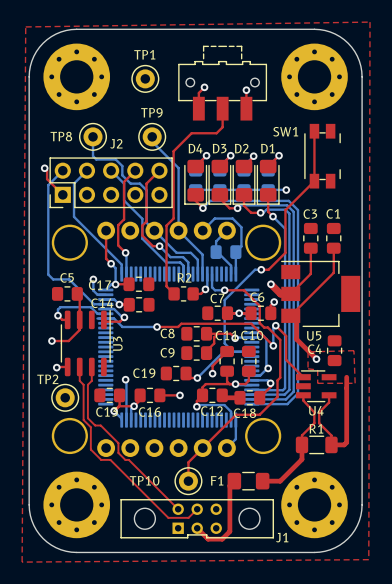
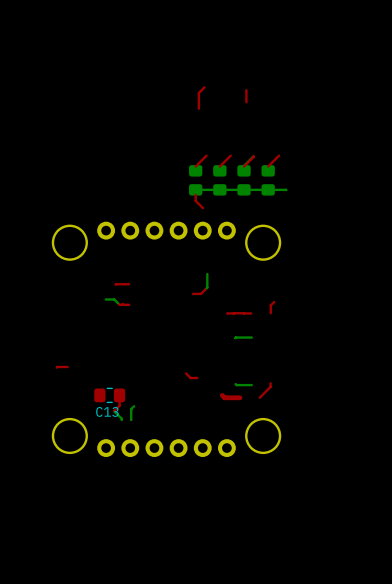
top zone outline: (370, 22) (25, 26) (22, 562) (368, 559) (370, 22) -> none
board edge: (76, 29) (319, 29) (330, 31) (344, 39) (357, 56) (362, 76) (362, 504) (359, 520) (354, 530) (344, 542) (335, 547) (314, 552) (71, 552) (61, 549) (47, 542) (33, 525) (29, 504) (29, 71) (36, 51) (47, 39) (61, 31) (76, 29) -> none
part: (76, 76) -> none
part: (314, 76) -> none
TP1: (145, 78) -> none
part: (222, 83) -> none
via: (204, 87) -> none
via: (246, 90) -> none
top track: (222, 108) (222, 127) (216, 133) (191, 133) (173, 151) (173, 218) (166, 225) (166, 286) (174, 293) -> none
top track: (314, 131) (314, 181) (285, 210) (285, 252) (268, 269) (261, 269) -> none
bottom track: (93, 136) (93, 156) (96, 159) (115, 159) (122, 166) (122, 175) (130, 183) (139, 183) (146, 190) (146, 222) (176, 252) (190, 252) (197, 259) (197, 274) -> none
TP8: (93, 136) -> none
bottom track: (152, 136) (152, 141) (178, 168) (178, 230) (202, 254) (202, 274) -> none
TP9: (152, 136) -> none
via: (206, 155) -> none
via: (230, 155) -> none
via: (279, 155) -> none
via: (253, 156) -> none
SW1: (322, 156) -> none
top track: (44, 168) (47, 170) (47, 179) (62, 194) -> none
via: (44, 168) -> none
bottom track: (62, 170) (48, 185) (48, 274) (53, 279) (69, 279) (94, 304) (105, 304) -> none
bottom track: (86, 170) (74, 183) (74, 216) (121, 264) (121, 274) -> none
bottom track: (111, 170) (124, 183) (124, 200) (142, 218) (142, 238) (166, 262) (180, 262) (183, 265) (183, 274) -> none
top track: (135, 170) (124, 181) (124, 219) (118, 225) (118, 245) (125, 252) -> none
top track: (159, 170) (146, 183) (146, 221) (142, 225) (142, 235) (152, 246) (159, 246) -> none
J2: (111, 182) -> none
D4: (195, 182) -> none
D3: (219, 182) -> none
D2: (244, 182) -> none
D1: (268, 182) -> none
via: (286, 190) -> none
top track: (219, 194) (219, 198) (229, 208) (237, 208) -> none
top track: (244, 194) (244, 205) (251, 212) (260, 212) -> none
top track: (268, 194) (268, 211) (273, 216) -> none
bottom track: (202, 208) (210, 200) (288, 200) (298, 210) (298, 393) (287, 404) (251, 404) -> none
via: (202, 208) -> none
bottom track: (237, 208) (240, 205) (287, 205) (293, 211) (293, 391) (286, 399) (251, 399) -> none
via: (237, 208) -> none
bottom track: (260, 212) (266, 209) (285, 209) (289, 213) (289, 389) (284, 394) (251, 394) -> none
via: (260, 212) -> none
bottom track: (273, 216) (285, 228) (285, 388) (282, 390) (251, 389) -> none
via: (273, 216) -> none
top track: (106, 230) (106, 258) (111, 263) -> none
bottom track: (202, 230) (214, 218) (232, 218) (241, 227) (241, 246) (235, 252) (235, 274) -> none
bottom track: (226, 230) (216, 241) (216, 252) (231, 265) (231, 274) -> none
C3: (310, 238) -> none
C1: (333, 238) -> none
bottom track: (159, 246) (170, 257) (183, 257) (188, 262) (188, 274) -> none
via: (159, 246) -> none
top track: (310, 248) (310, 273) (290, 293) (280, 293) (270, 284) -> none
top track: (333, 248) (333, 272) (290, 315) -> none
bottom track: (125, 252) (126, 274) -> none
via: (125, 252) -> none
part: (225, 252) -> none
bottom track: (111, 263) (115, 268) (115, 284) (111, 284) (105, 289) -> none
via: (111, 263) -> none
bottom track: (261, 269) (255, 269) (224, 300) (224, 343) (233, 351) -> none
via: (261, 269) -> none
bottom track: (212, 274) (212, 287) (215, 290) (224, 290) -> none
bottom track: (93, 279) (93, 290) (97, 294) (105, 294) -> none
via: (93, 279) -> none
via: (115, 284) -> none
C17: (138, 284) -> none
via: (270, 284) -> none
via: (205, 289) -> none
top track: (224, 290) (244, 290) (259, 306) (259, 323) (264, 327) (267, 327) (280, 339) (280, 377) (277, 380) (277, 396) (259, 414) (236, 414) (188, 462) (188, 481) -> none
via: (224, 290) -> none
C5: (67, 293) -> none
top track: (77, 293) (79, 296) (79, 329) (68, 341) (51, 341) -> none
R2: (183, 293) -> none
U5: (320, 293) -> none
via: (274, 302) -> none
via: (119, 304) -> none
C14: (139, 304) -> none
bottom track: (105, 309) (114, 309) (124, 317) -> none
bottom track: (105, 313) (97, 313) (90, 307) (60, 307) (57, 309) (57, 315) -> none
C7: (217, 313) -> none
via: (239, 313) -> none
C6: (260, 313) -> none
top track: (57, 315) (62, 319) (67, 319) -> none
via: (57, 315) -> none
top track: (296, 315) (296, 339) (316, 359) -> none
top track: (124, 317) (120, 321) (105, 321) (103, 319) -> none
via: (124, 317) -> none
bottom track: (97, 318) (114, 318) (122, 326) (157, 326) -> none
top track: (275, 325) (286, 336) (286, 359) (303, 377) -> none
bottom track: (275, 325) (273, 328) (273, 345) -> none
via: (275, 325) -> none
top track: (157, 326) (178, 326) (181, 323) (251, 323) (273, 345) -> none
via: (157, 326) -> none
bottom track: (251, 332) (260, 332) (266, 339) (266, 366) (268, 368) (260, 375) (251, 375) -> none
C8: (196, 333) -> none
top track: (206, 333) (230, 333) (235, 338) -> none
top track: (217, 333) (214, 337) (214, 343) (206, 353) -> none
via: (235, 338) -> none
via: (51, 341) -> none
U3: (85, 343) -> none
via: (273, 345) -> none
part: (178, 347) -> none
C4: (334, 350) -> none
top zone outline: (353, 350) (308, 351) (308, 368) (317, 370) (317, 383) (355, 383) (353, 350) -> none
top track: (227, 351) (212, 365) (212, 373) -> none
bottom track: (251, 351) (223, 351) (197, 378) -> none
C9: (196, 353) -> none
via: (316, 359) -> none
C11: (227, 361) -> none
C10: (248, 361) -> none
top track: (79, 366) (79, 380) (83, 384) (83, 420) (90, 427) (90, 449) (101, 459) (110, 459) (168, 517) (188, 517) (197, 509) -> none
top track: (91, 366) (91, 380) (87, 384) (87, 418) (95, 425) (100, 425) (118, 443) (118, 452) (125, 459) (128, 459) (178, 509) -> none
via: (56, 367) -> none
via: (268, 368) -> none
top track: (227, 371) (227, 381) (229, 384) -> none
top track: (248, 371) (248, 380) (245, 384) (205, 384) (202, 387) (202, 395) (196, 401) (196, 406) -> none
C19: (176, 373) -> none
via: (212, 373) -> none
top track: (346, 377) (346, 442) (344, 444) (331, 444) (331, 435) (319, 423) (319, 412) (329, 402) (329, 395) -> none
via: (197, 378) -> none
bottom track: (125, 379) (126, 420) -> none
via: (125, 379) -> none
bottom track: (251, 380) (267, 380) (270, 383) -> none
via: (270, 383) -> none
via: (235, 384) -> none
U4: (316, 386) -> none
top track: (140, 395) (140, 400) (134, 406) (118, 406) -> none
C16: (149, 395) -> none
top track: (159, 395) (179, 395) -> none
via: (179, 395) -> none
C12: (212, 395) -> none
top track: (303, 395) (303, 400) (314, 412) (314, 423) (301, 435) (301, 459) (280, 481) (262, 481) -> none
TP2: (65, 397) -> none
C18: (249, 397) -> none
via: (134, 406) -> none
bottom track: (196, 406) (198, 405) (224, 405) (231, 411) (231, 420) -> none
via: (196, 406) -> none
via: (114, 411) -> none
bottom track: (235, 420) (235, 439) (226, 448) -> none
R1: (316, 444) -> none
TP10: (188, 481) -> none
top track: (234, 481) (229, 485) (229, 531) (222, 539) (208, 539) (197, 528) -> none
F1: (248, 481) -> none
part: (76, 504) -> none
part: (314, 504) -> none
J1: (197, 518) -> none

